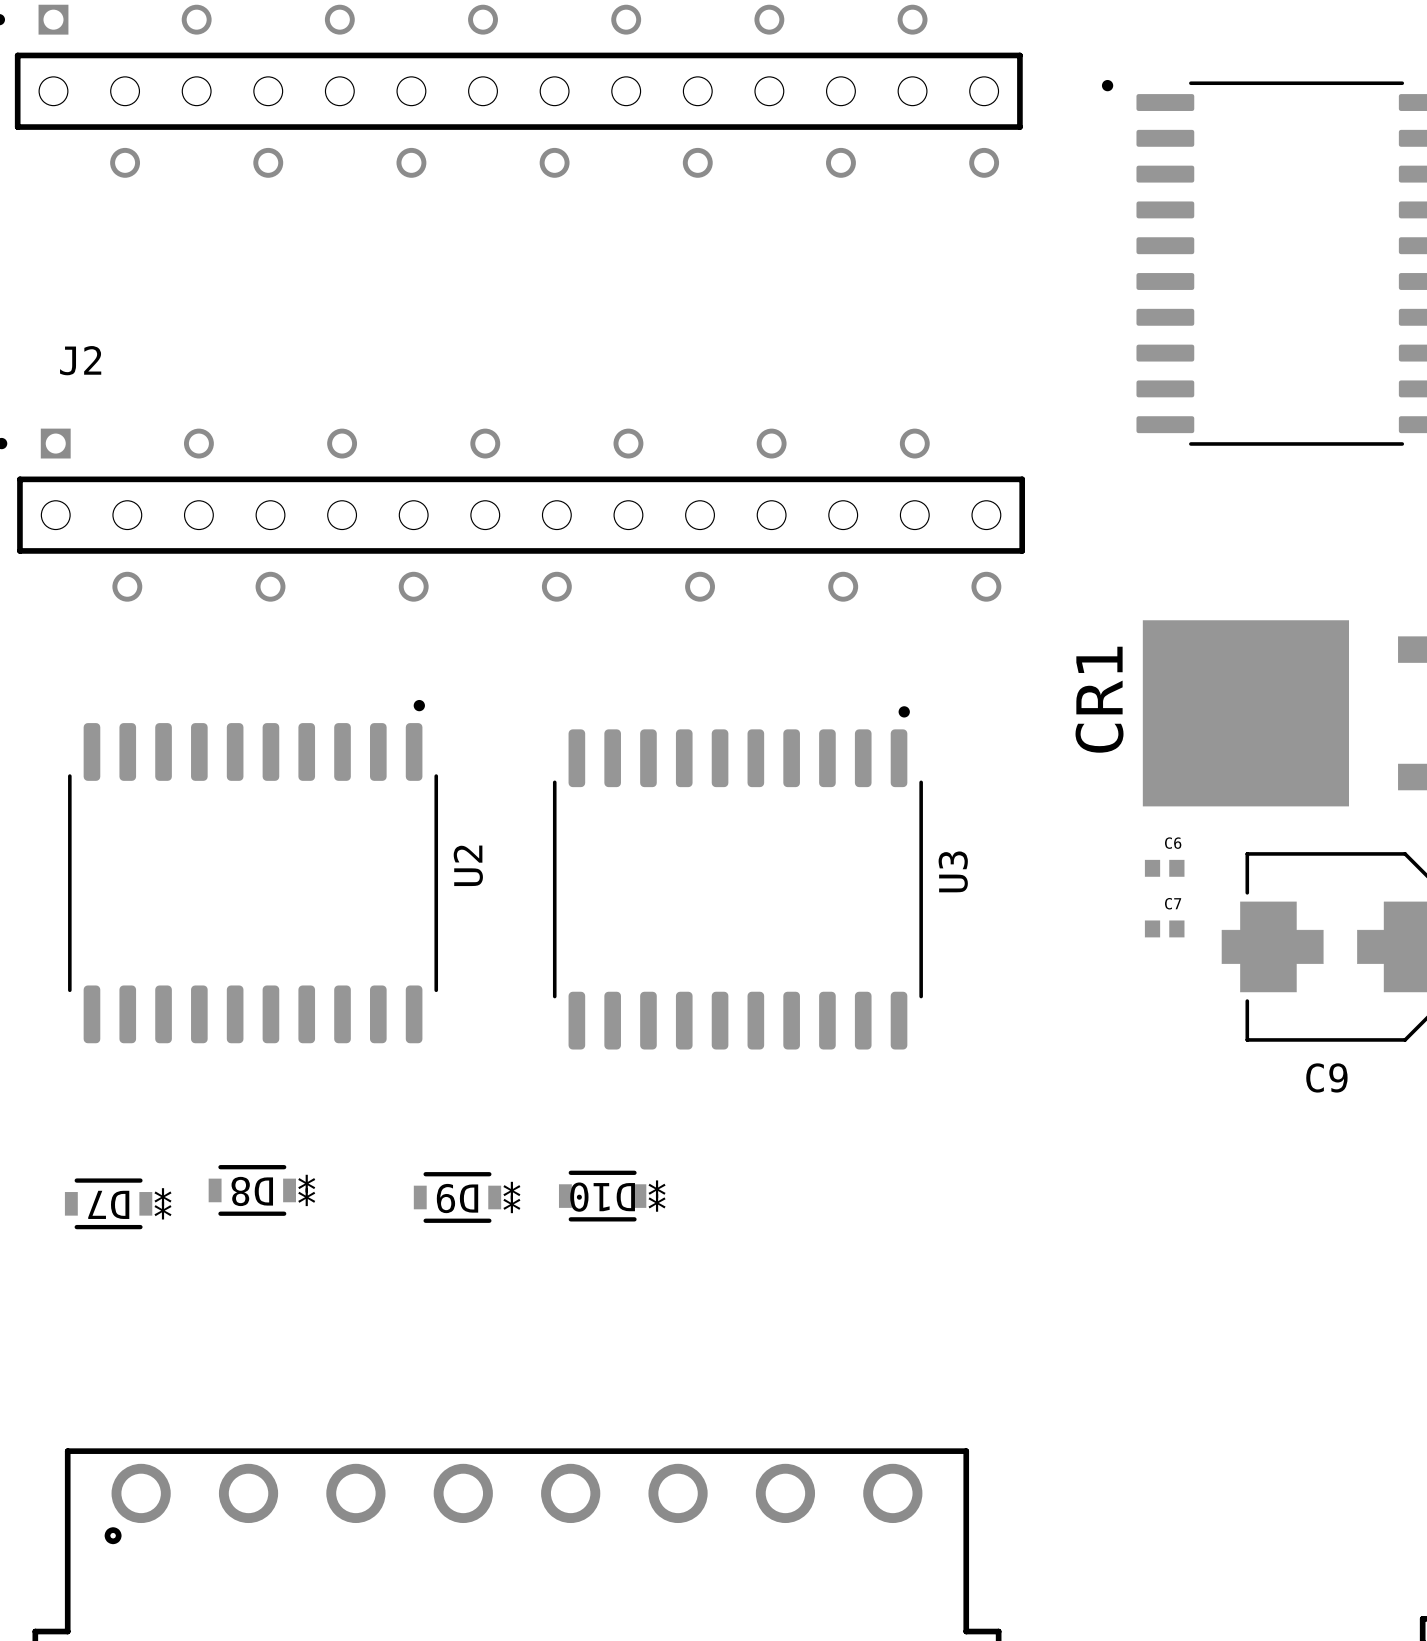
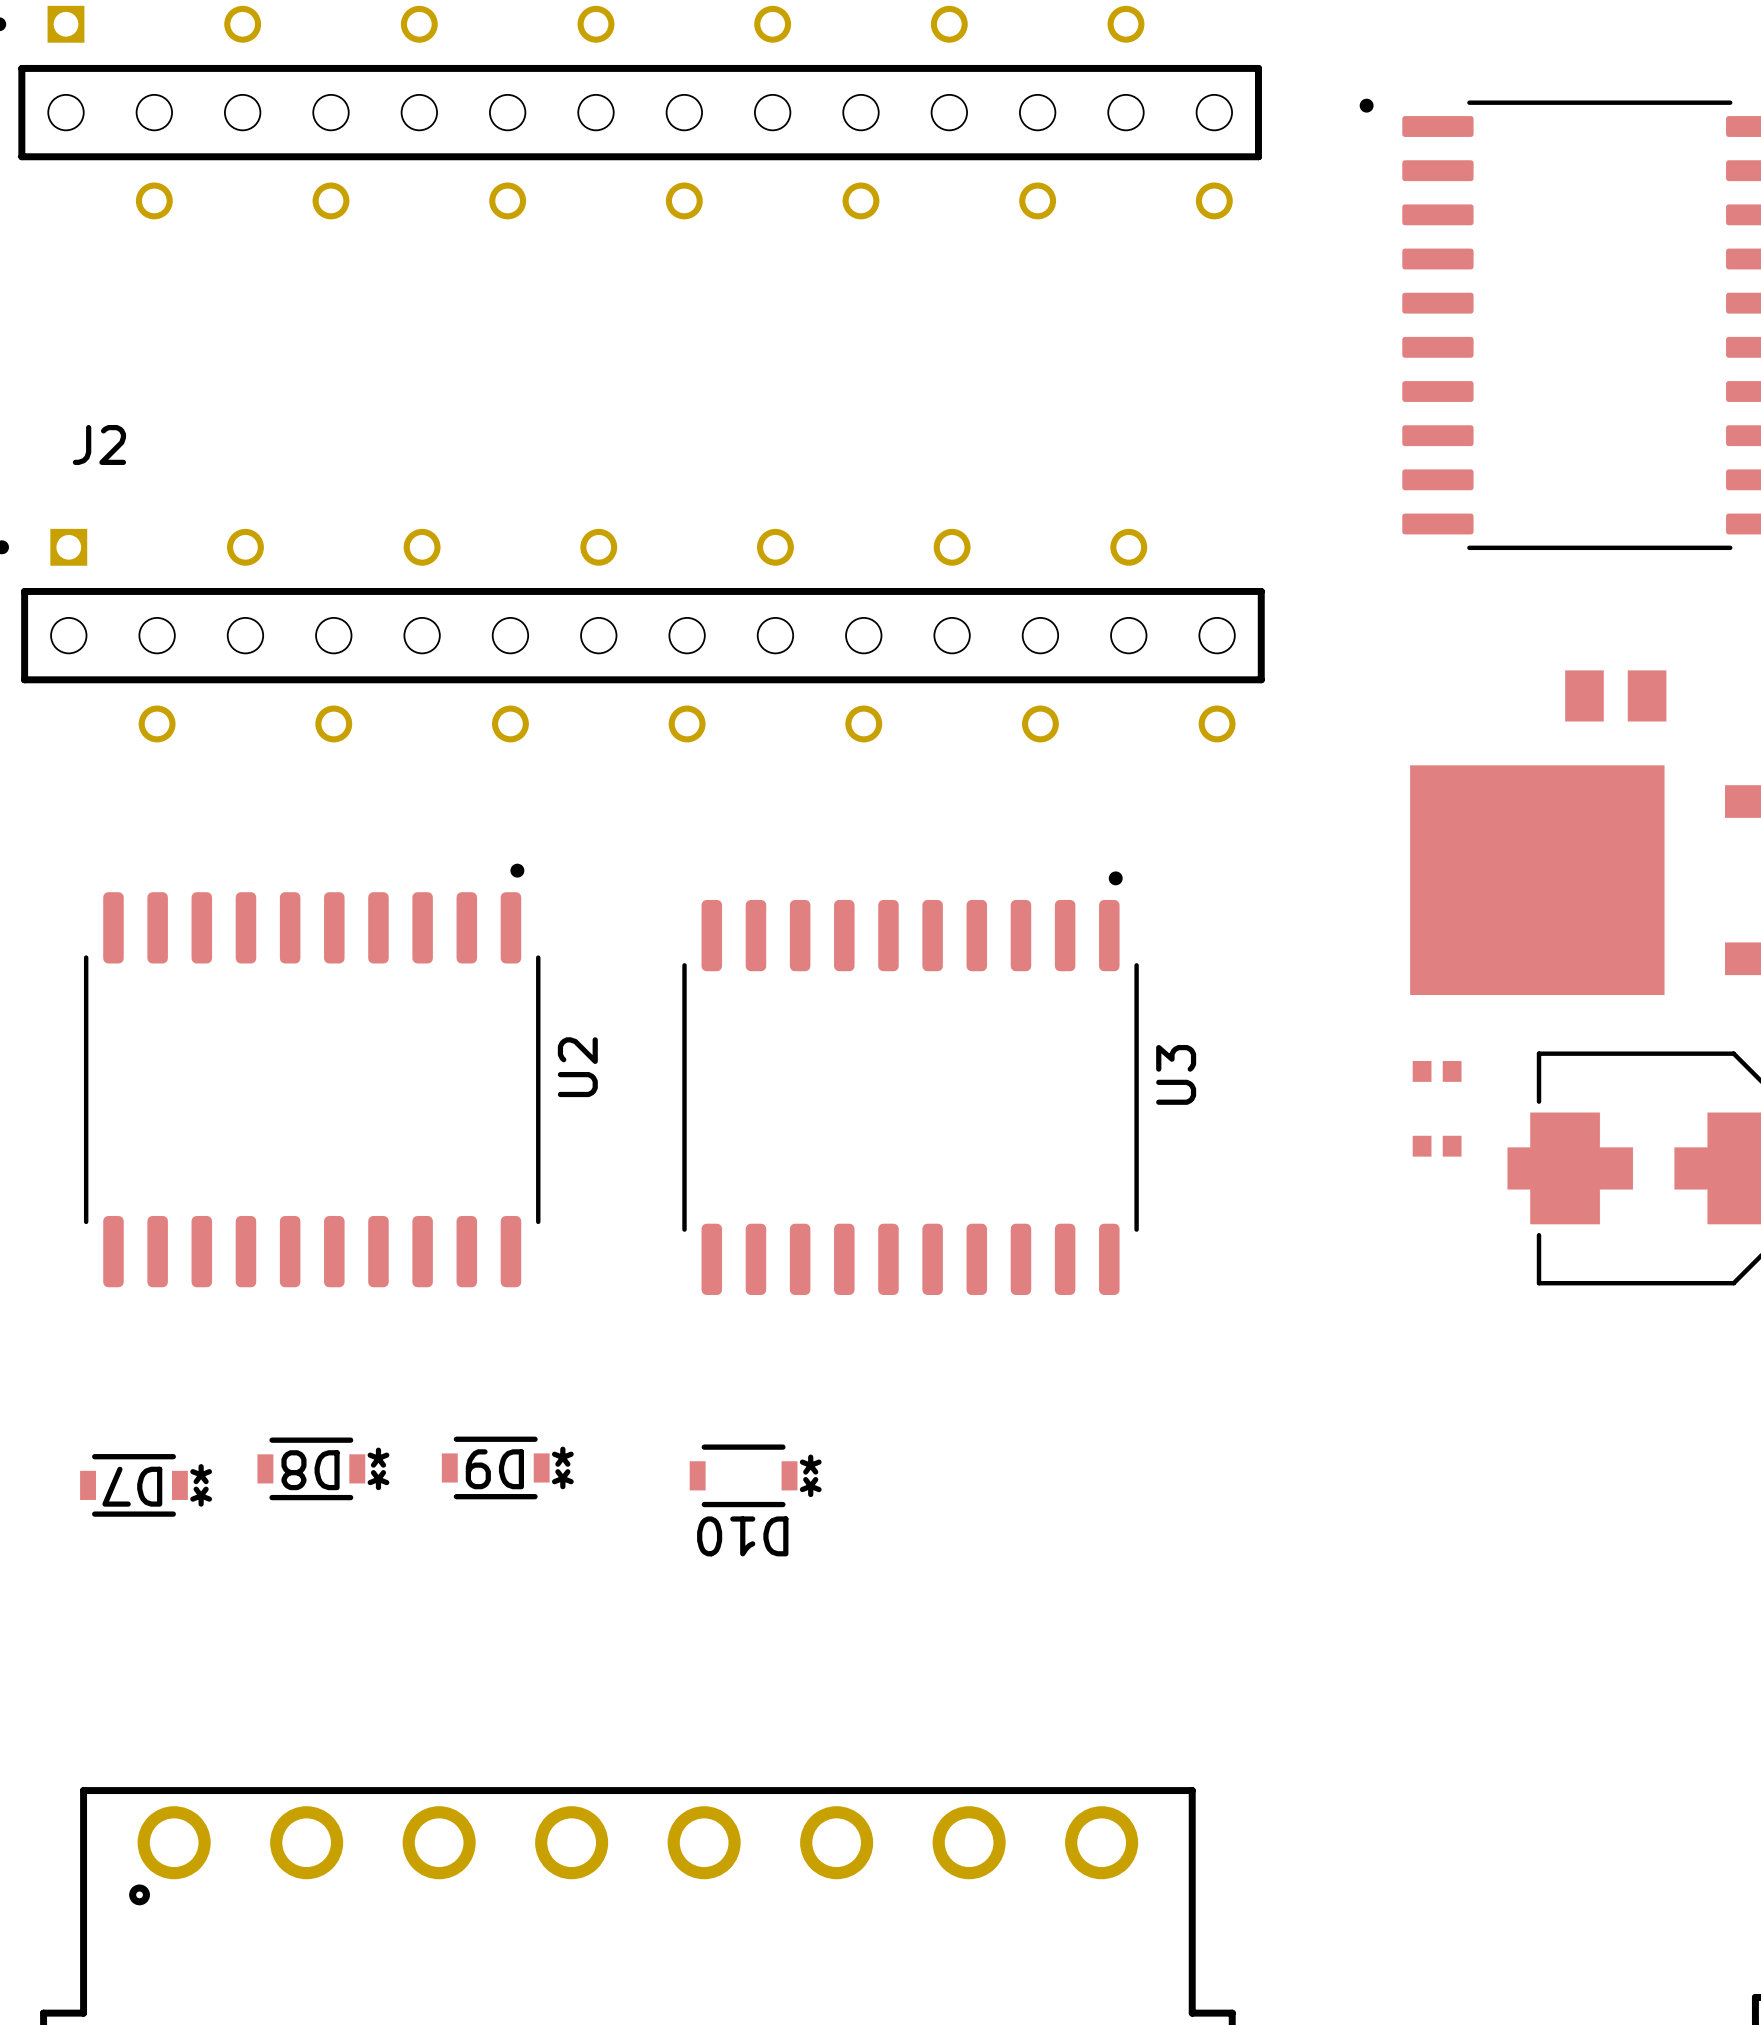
part: none -> (1615, 695)
CR1 name: CR1 (1099, 699) -> none
C6 name: C6 (1173, 843) -> none
C7 name: C7 (1173, 903) -> none
C9 name: C9 (1326, 1077) -> none
D9 position: (457, 1197) -> (495, 1467)
D10 name position: D10 (602, 1197) -> D10 (742, 1536)

